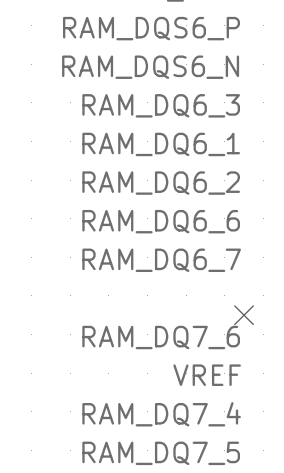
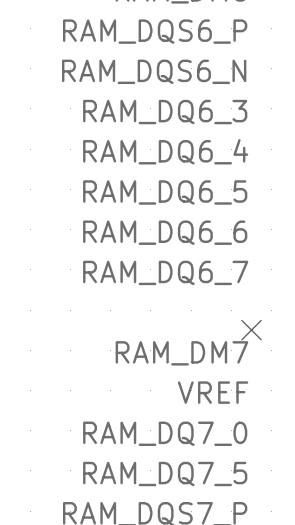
label: RAM_DQ6_1 (161, 144) -> RAM_DQ6_4 (165, 151)
label: RAM_DQ6_2 (161, 183) -> RAM_DQ6_5 (165, 192)
label: RAM_DQ7_6 (161, 337) -> RAM_DM7 (181, 353)
label: RAM_DQ7_4 (161, 414) -> RAM_DQ7_0 (165, 433)

